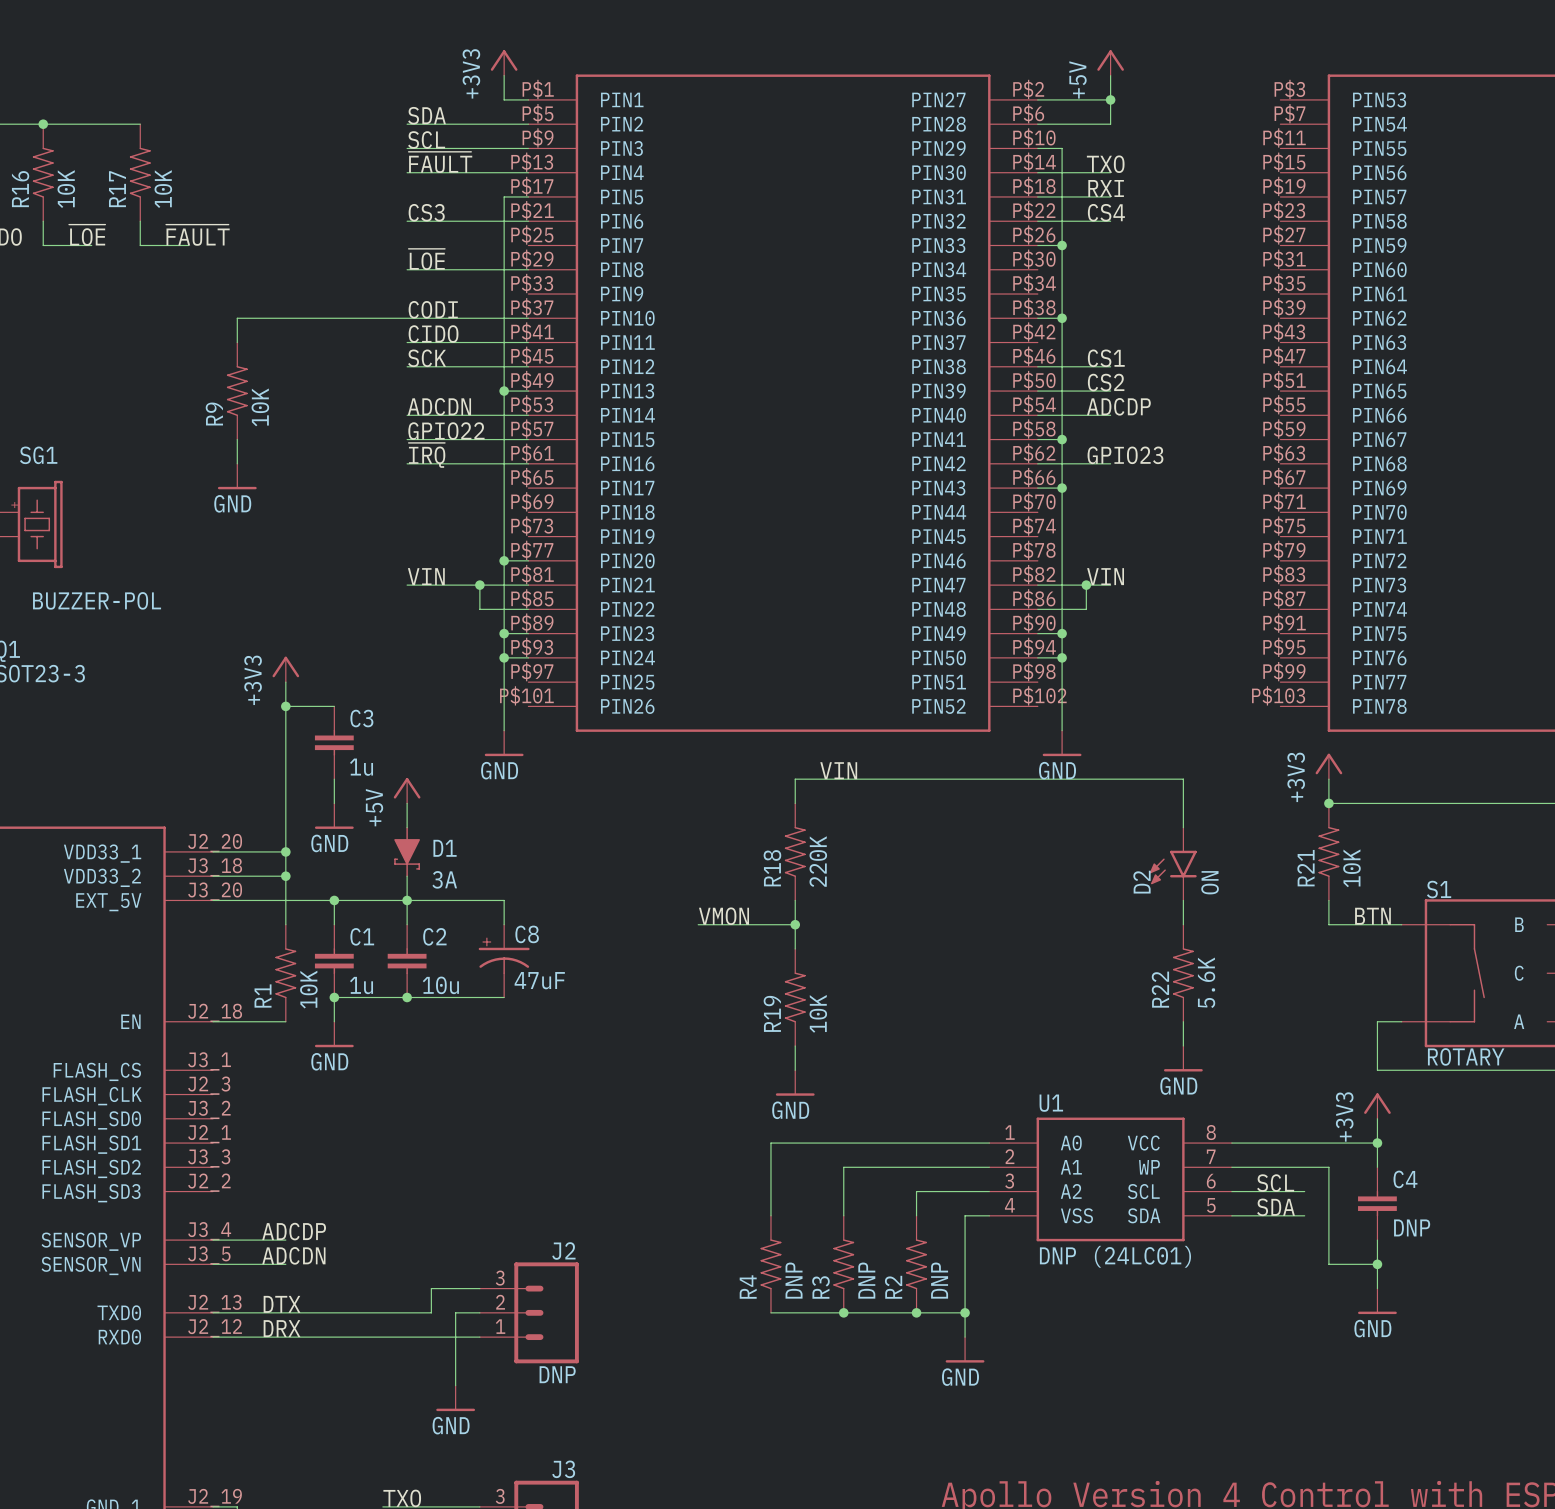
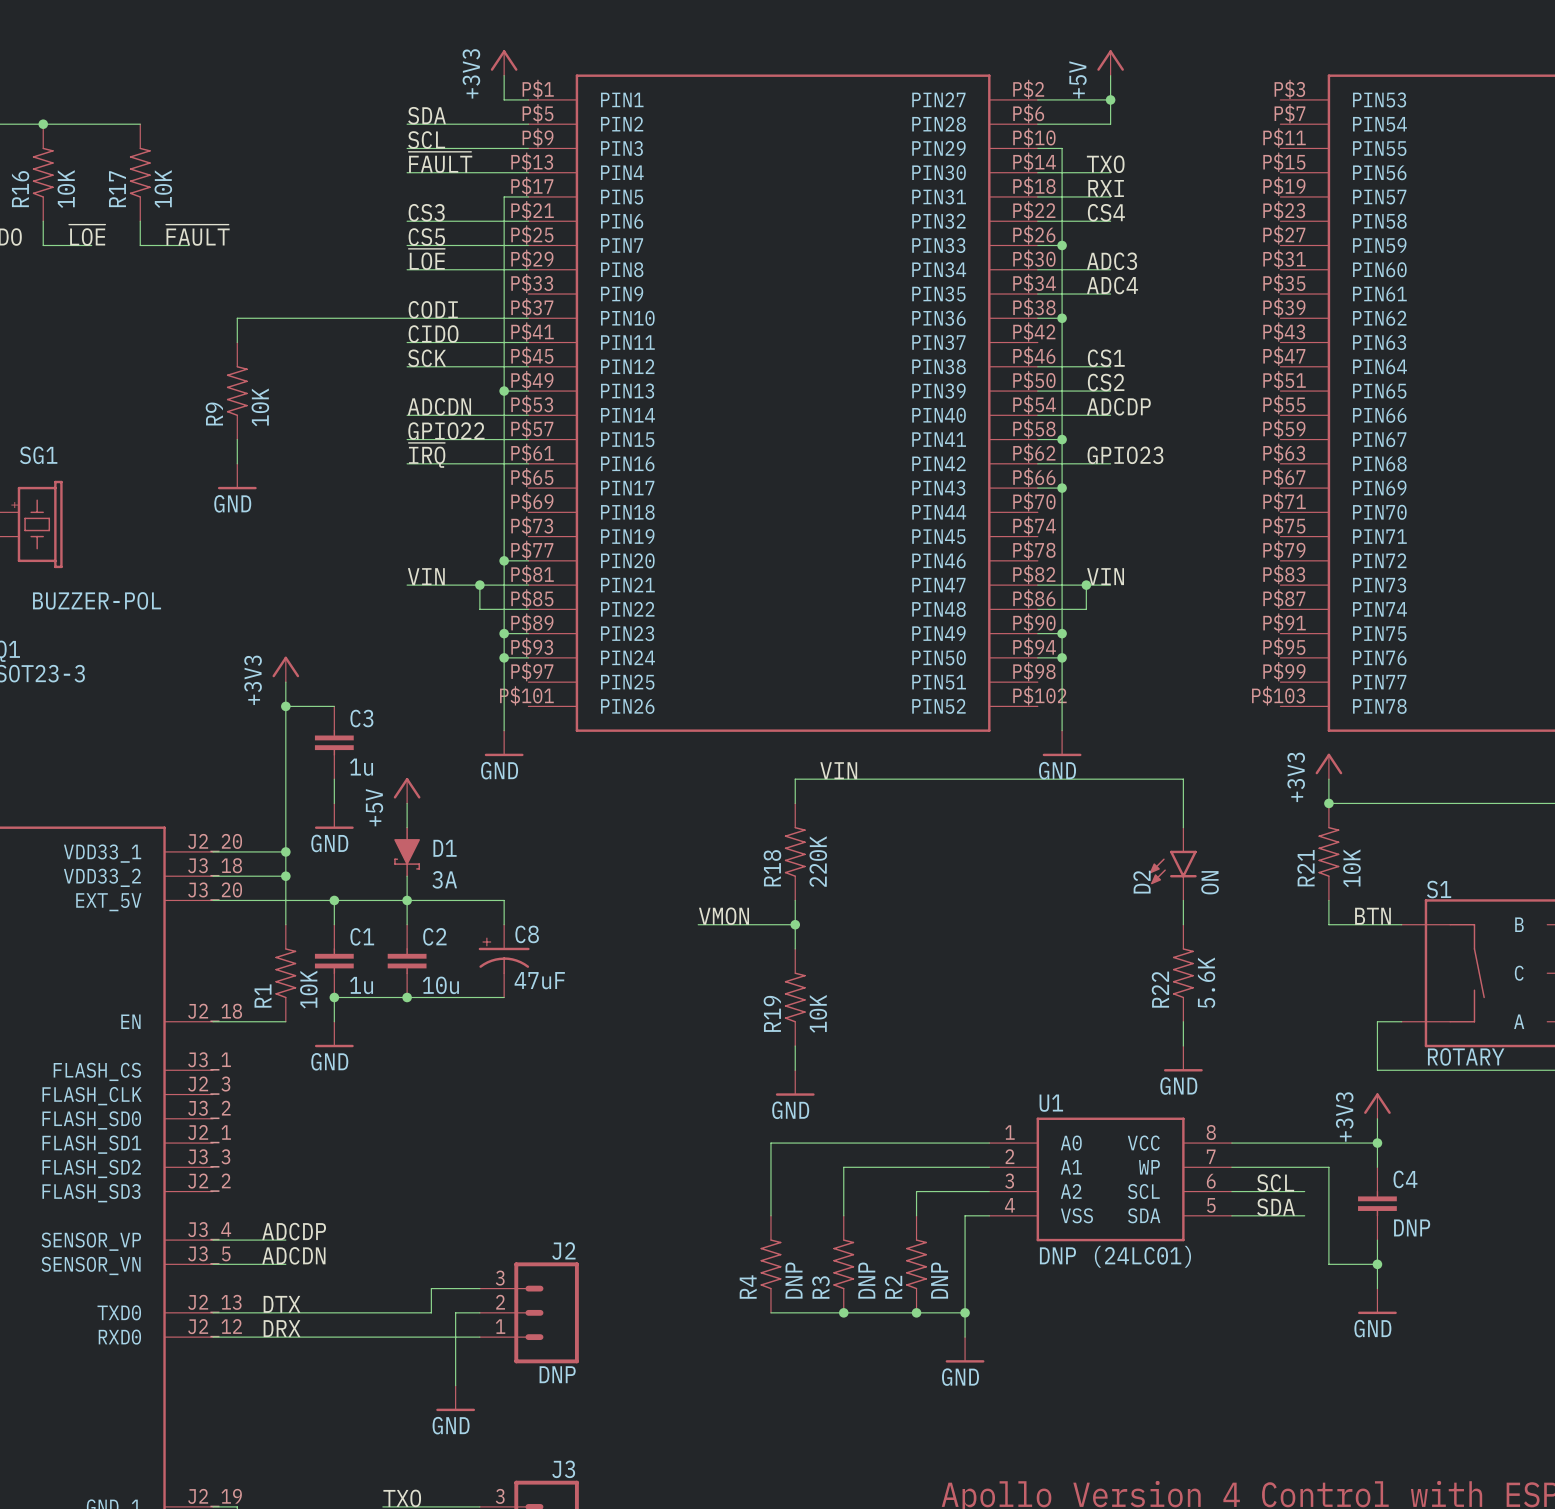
label: none -> CS5 (426, 237)
wire: none -> (407, 245) (528, 245)
label: none -> ADC3 (1112, 261)
wire: none -> (1037, 269) (1110, 269)
label: none -> ADC4 (1112, 285)
wire: none -> (1037, 294) (1110, 294)

